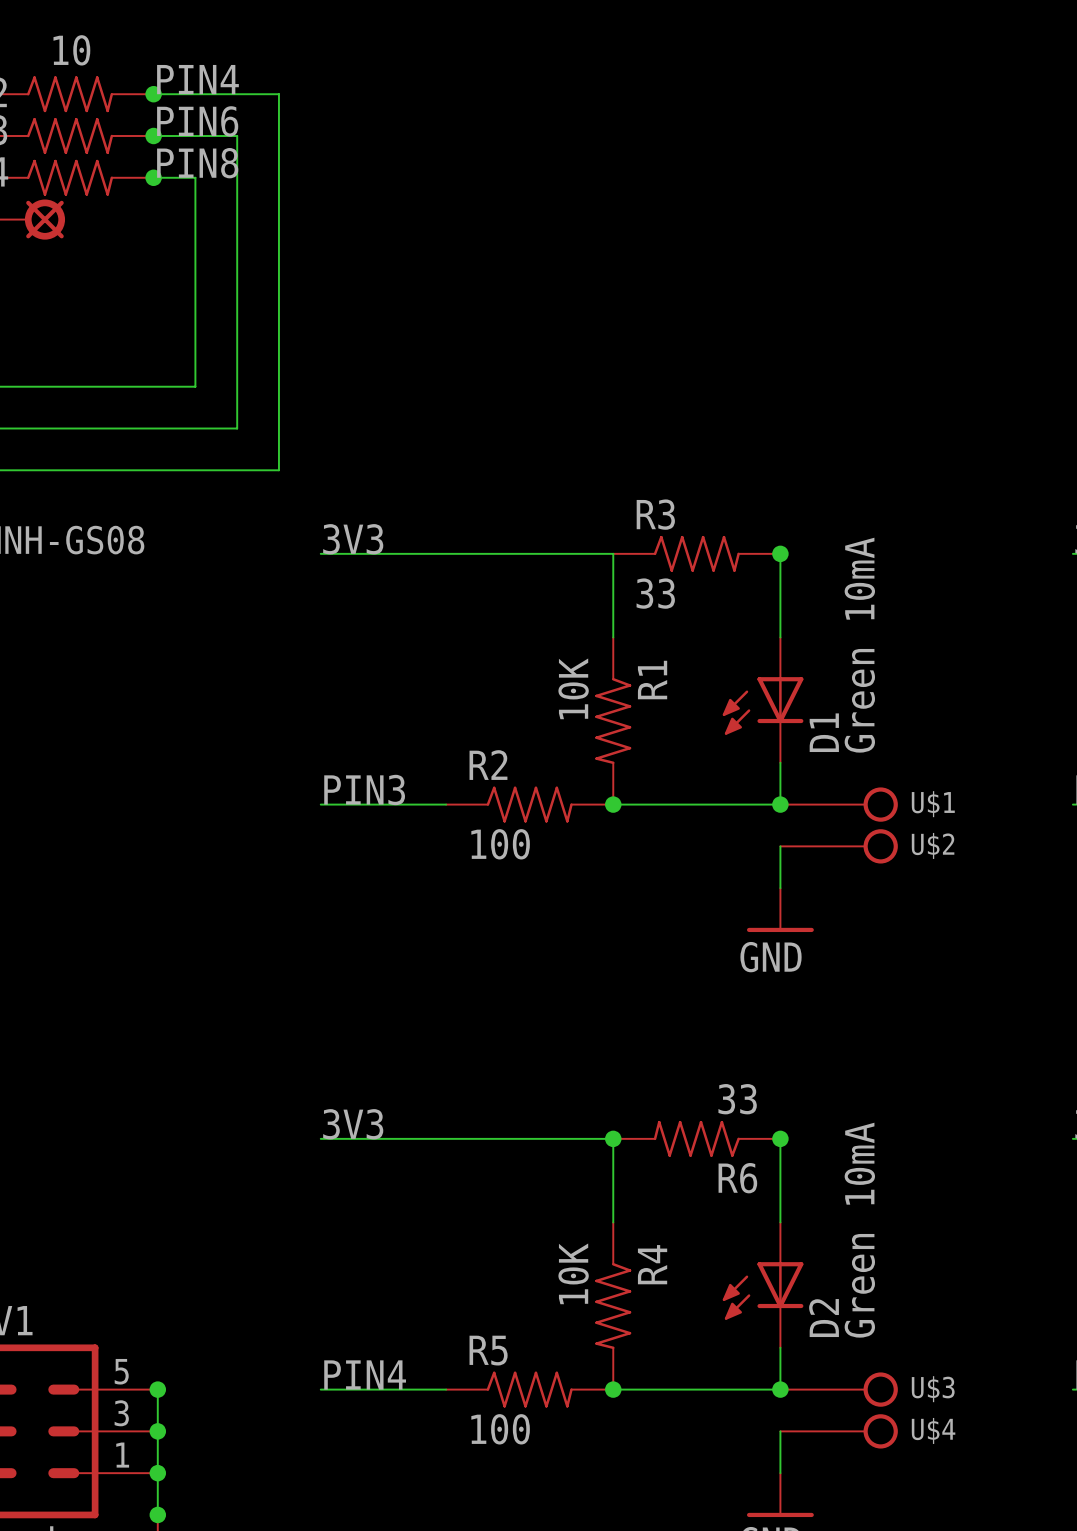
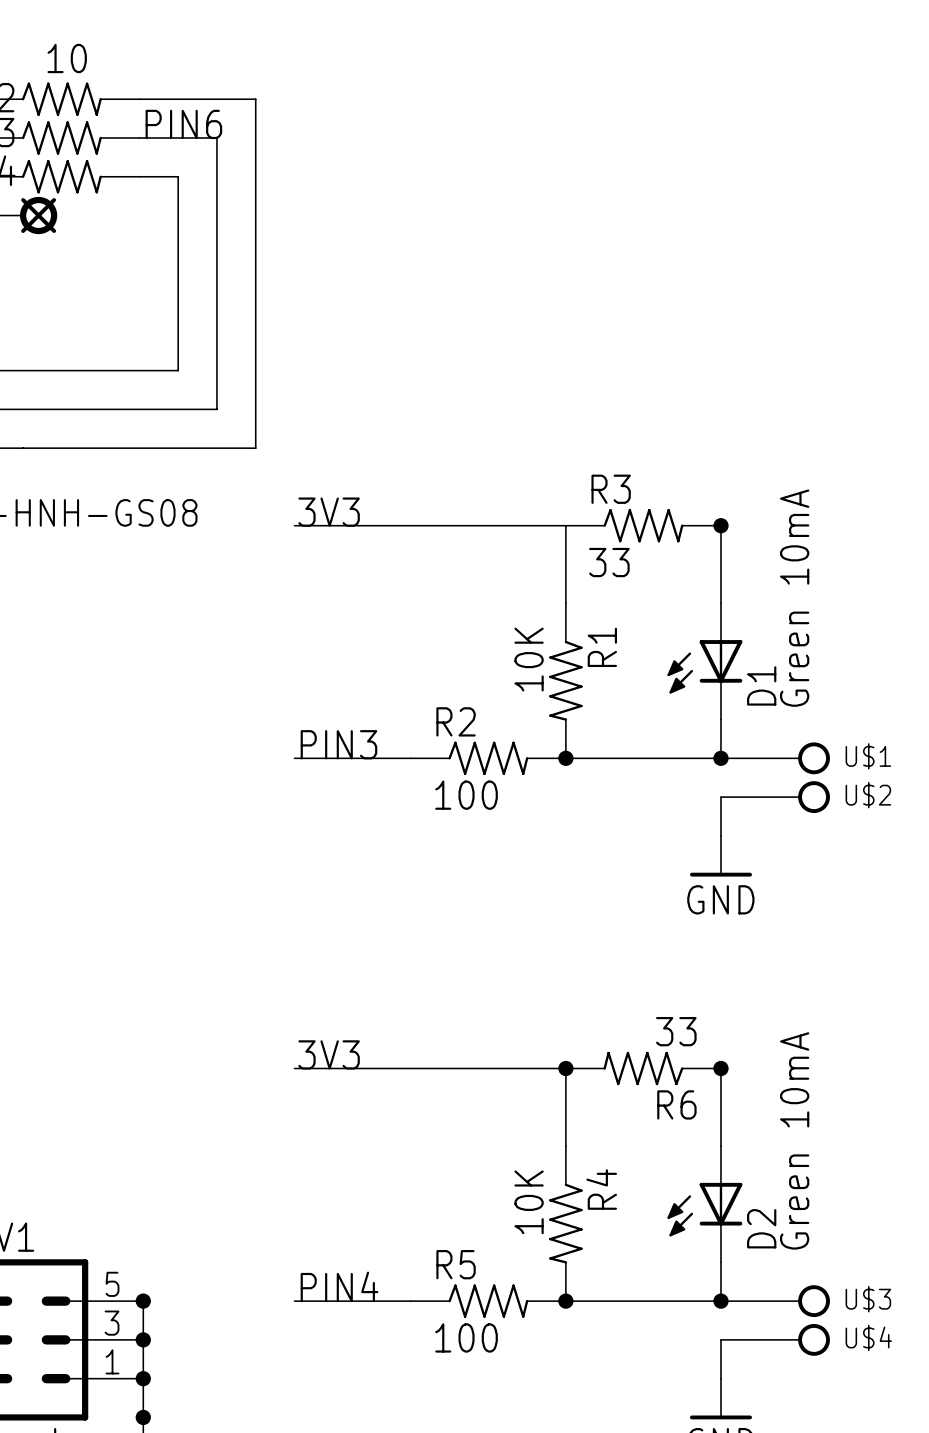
label: PIN4 (197, 79) -> none
junction: (153, 94) -> none
junction: (153, 135) -> none
label: PIN8 (197, 163) -> none
junction: (153, 177) -> none

